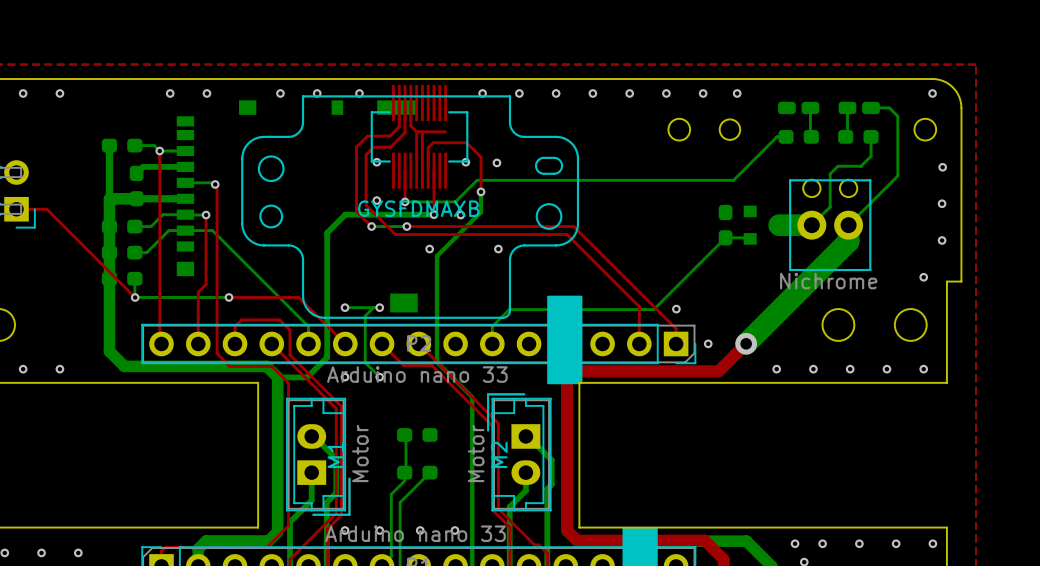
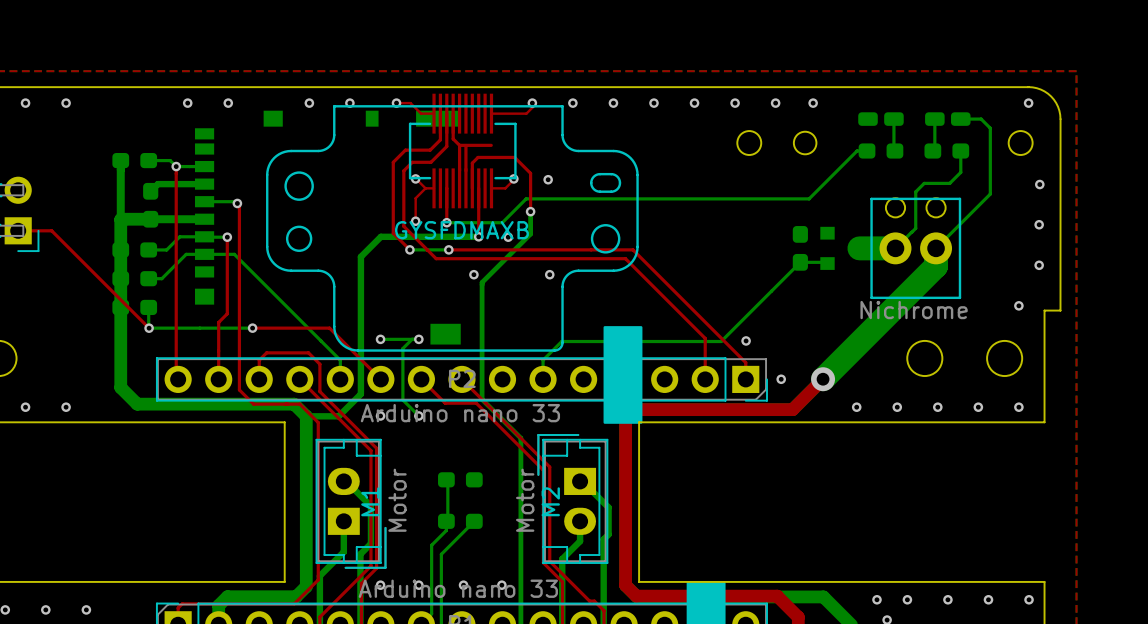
top track: none -> (396, 103) (410, 103) (421, 113) (434, 113)
top track: none -> (532, 103) (532, 107) (526, 113) (491, 113)
top track: none -> (415, 178) (425, 188)
top track: none -> (513, 178) (505, 188) (491, 188)
top track: none -> (425, 188) (434, 188)
top track: none -> (425, 188) (415, 198) (415, 221)

